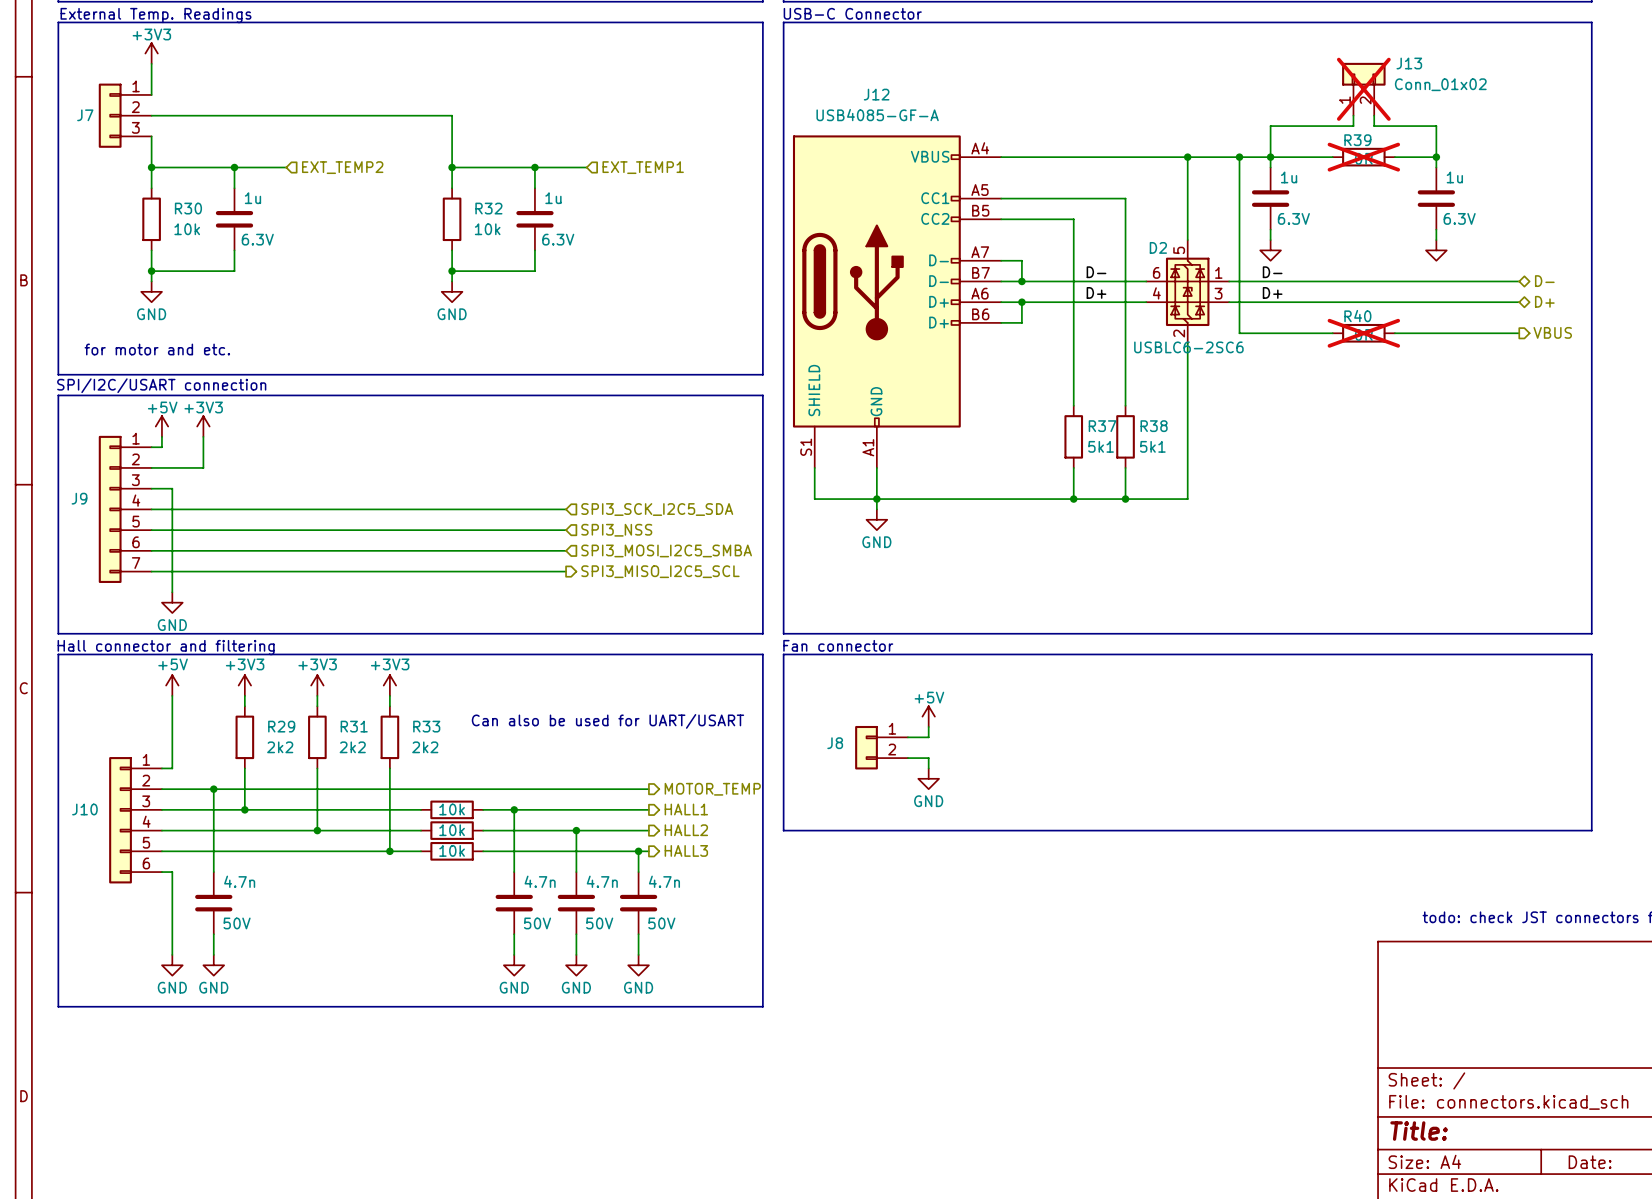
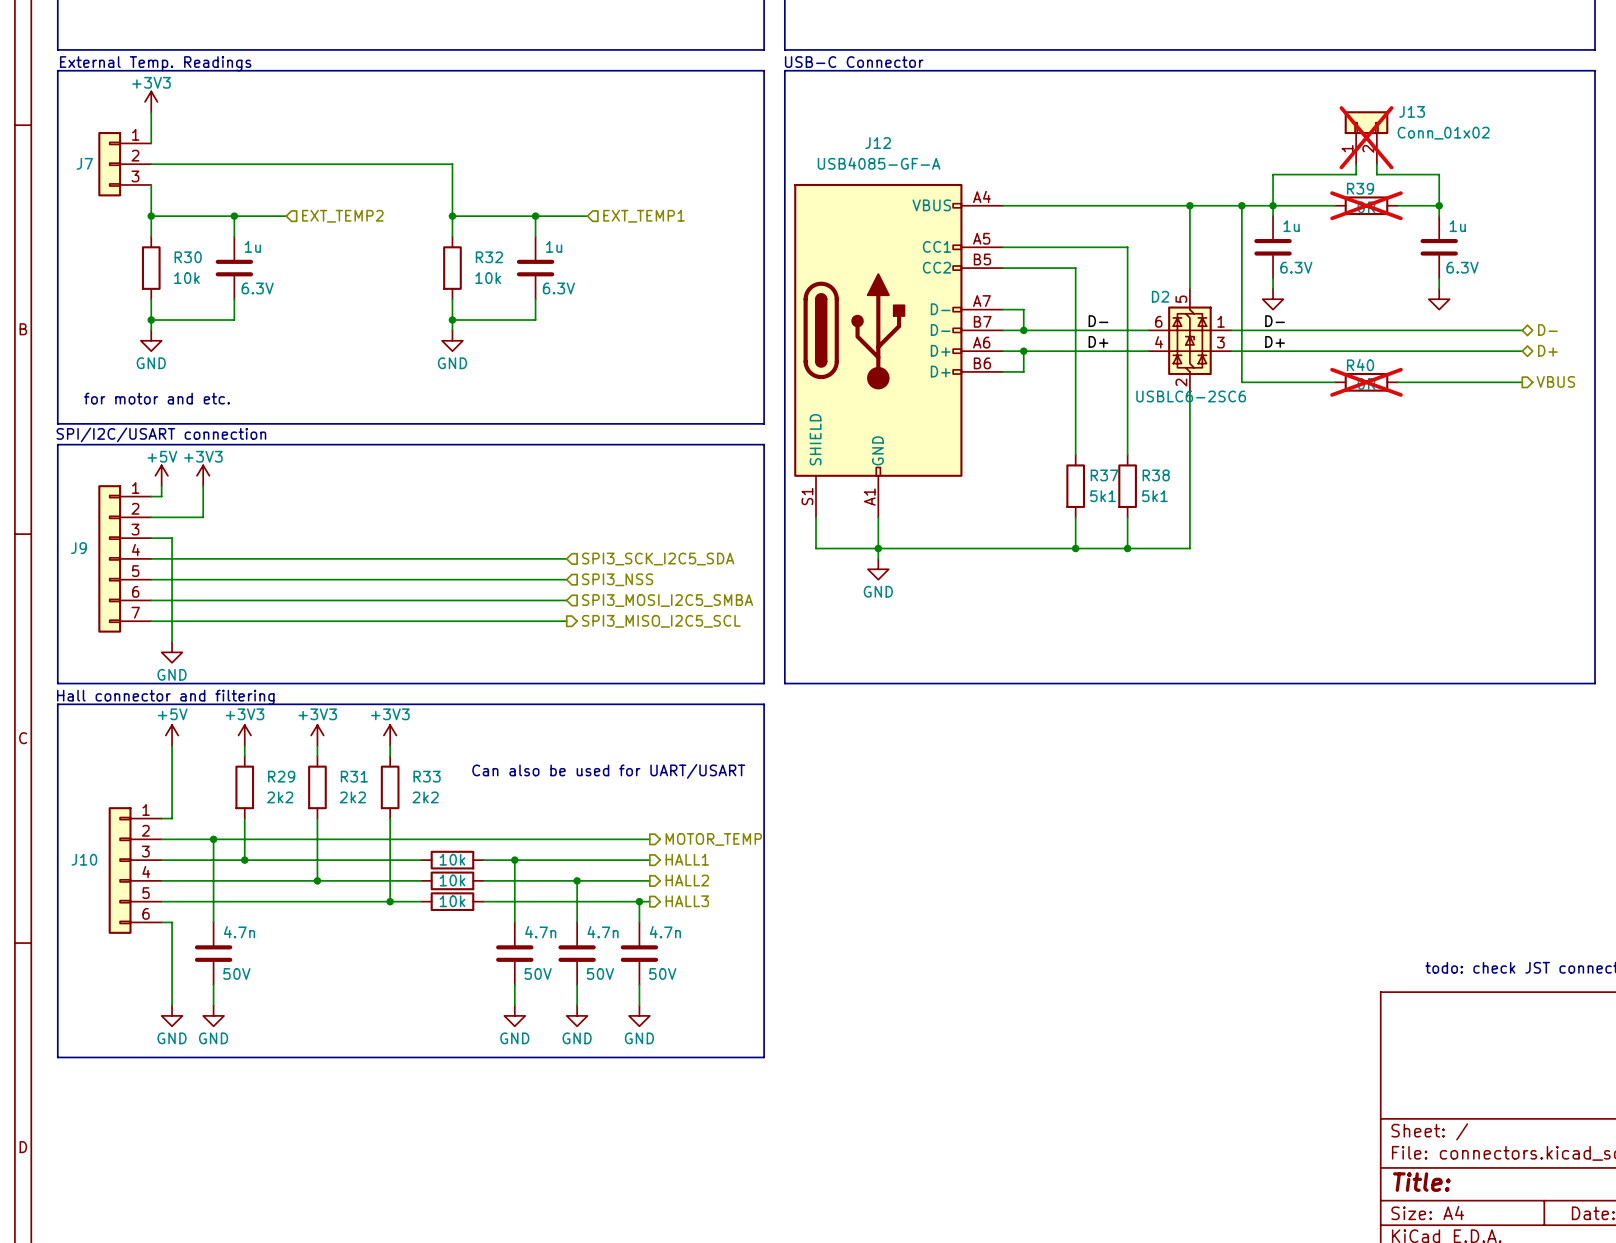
text: Fan connector (838, 645) -> none
line: (783, 654) (1591, 654) (1591, 830) (783, 830) (783, 654) -> none
power symbol: +5V (928, 716) -> none
wire: (928, 726) (928, 737) (907, 737) -> none
J8: (881, 747) -> none
wire: (907, 758) (928, 758) (928, 768) -> none
power symbol: GND (928, 778) -> none

